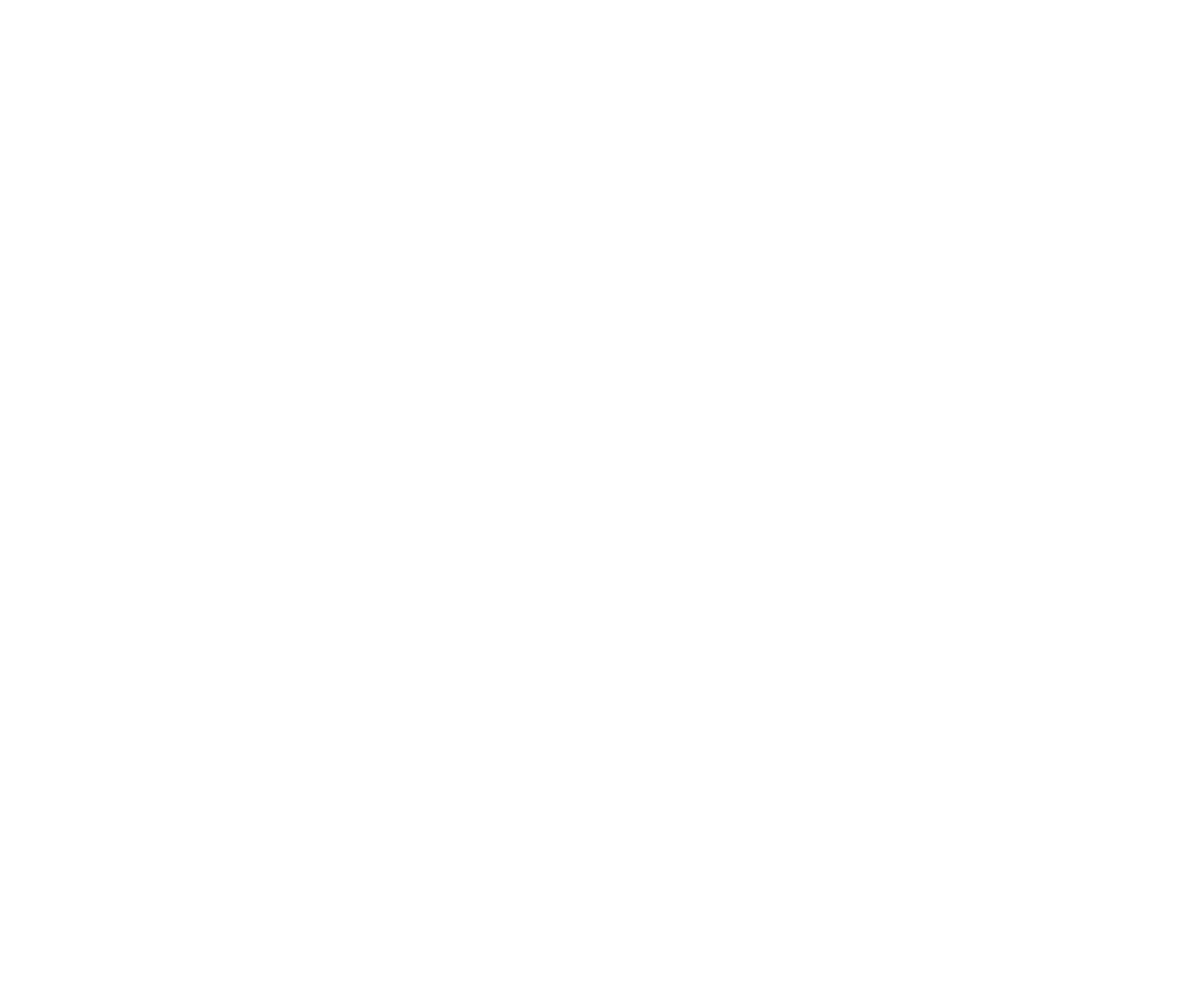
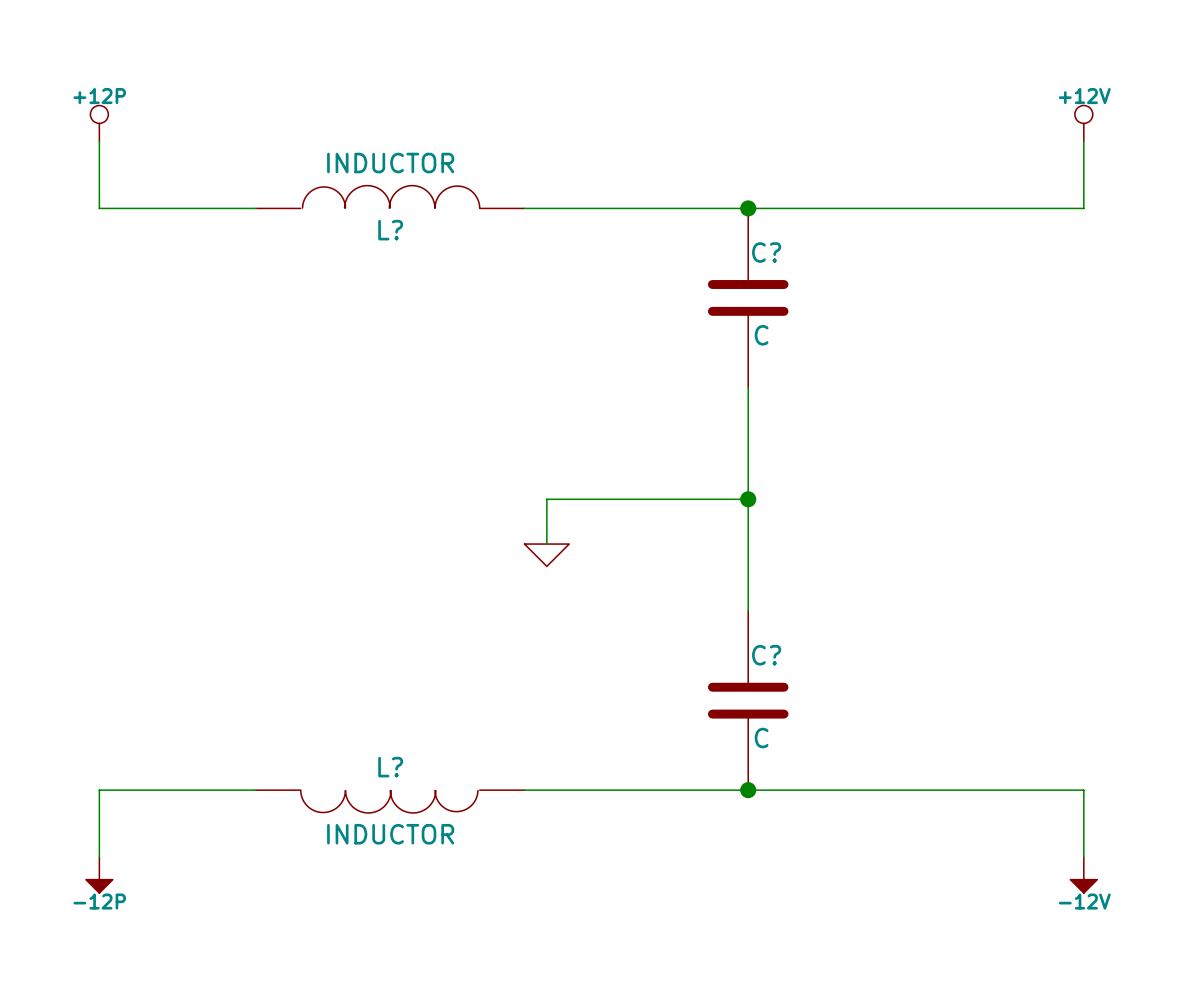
power symbol: none -> +12P (99, 123)
power symbol: none -> +12V (1083, 123)
wire: none -> (99, 141) (99, 208) (255, 208)
wire: none -> (1083, 141) (1083, 208) (524, 208)
L?: none -> INDUCTOR (390, 197)
junction: none -> (748, 208)
C?: none -> C (748, 297)
wire: none -> (748, 387) (748, 611)
wire: none -> (748, 499) (546, 499) (546, 544)
junction: none -> (748, 499)
power symbol: none -> (546, 555)
C?: none -> C (748, 700)
wire: none -> (255, 790) (99, 790) (99, 857)
wire: none -> (524, 790) (1083, 790) (1083, 857)
junction: none -> (748, 790)
L?: none -> INDUCTOR (390, 801)
power symbol: none -> -12P (99, 875)
power symbol: none -> -12V (1083, 875)

